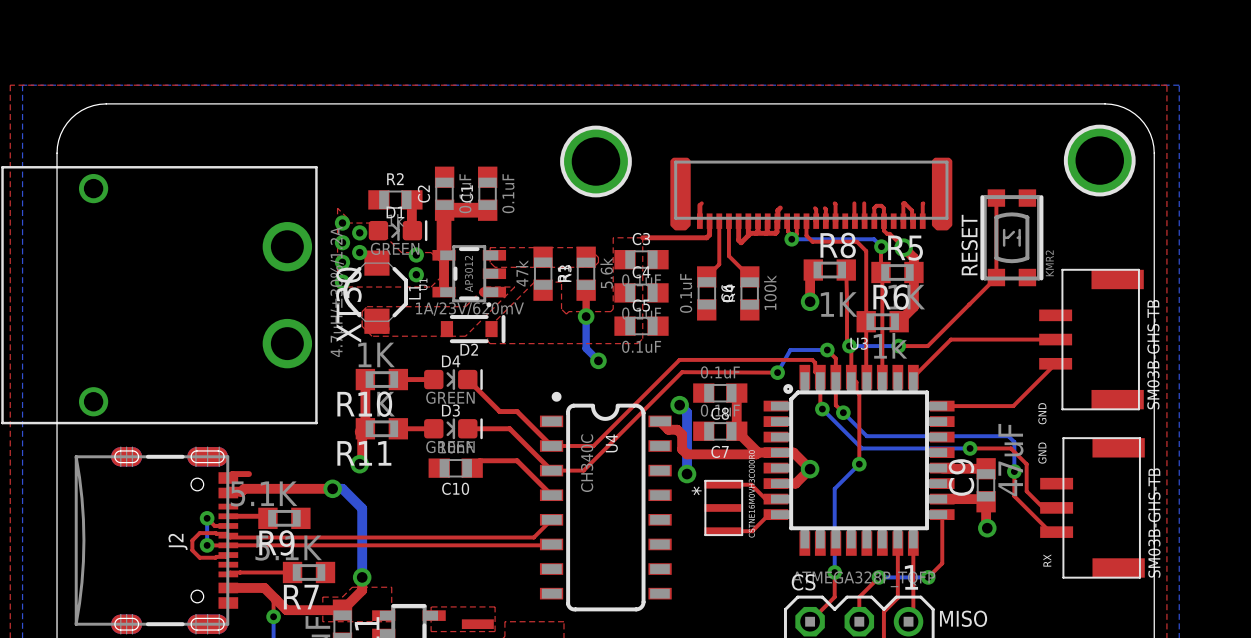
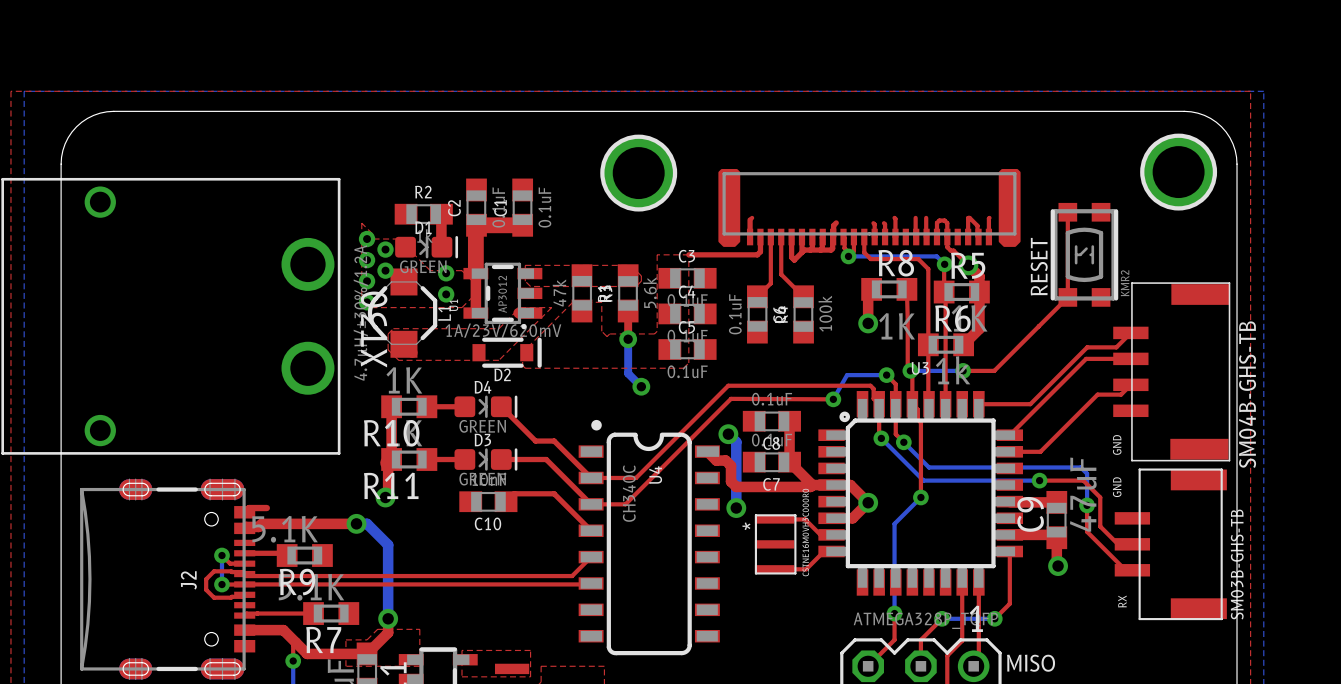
part footprint: [1039, 268, 1144, 411] -> [1113, 282, 1231, 462]
top track: (1055, 339) (950, 339) (913, 377) -> (1130, 332) (1116, 347) (1087, 347) (1030, 404) (978, 404)
top track: none -> (1130, 384) (1121, 394) (1097, 394) (1040, 451) (1009, 451)
top track: (1055, 363) (1013, 406) (942, 406) -> (1130, 358) (1086, 358) (1009, 435)
text: CS (803, 582) -> none

